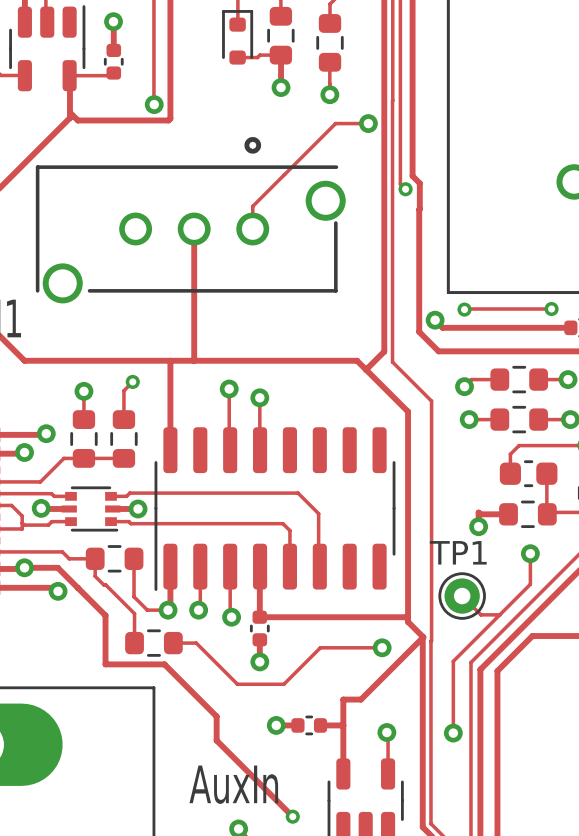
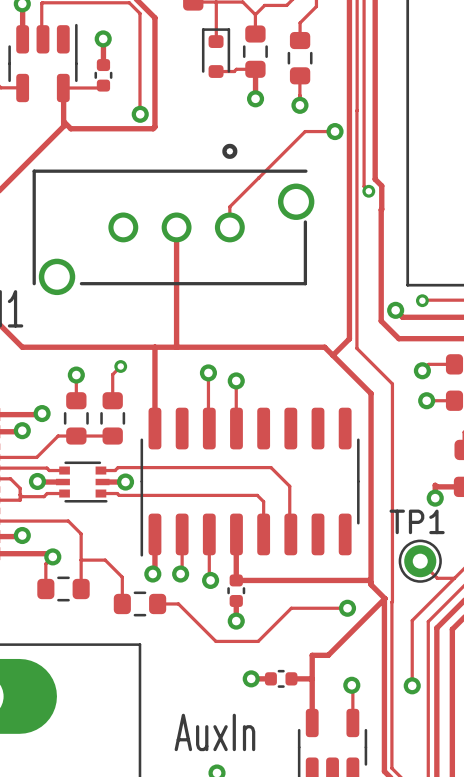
track: (62, 551) (69, 558) (95, 558) (95, 576) (115, 594) -> (56, 521) (68, 521) (81, 533) (81, 589)
part position: (114, 558) -> (63, 589)
track: (134, 558) (134, 596) (147, 610) (168, 610) -> none
track: (24, 567) (57, 567) (105, 615) (105, 664) (164, 664) (216, 716) (216, 740) (292, 816) -> none
track: none -> (52, 556) (45, 563) (45, 589)
track: none -> (81, 560) (105, 560)
via: (292, 816) -> none

